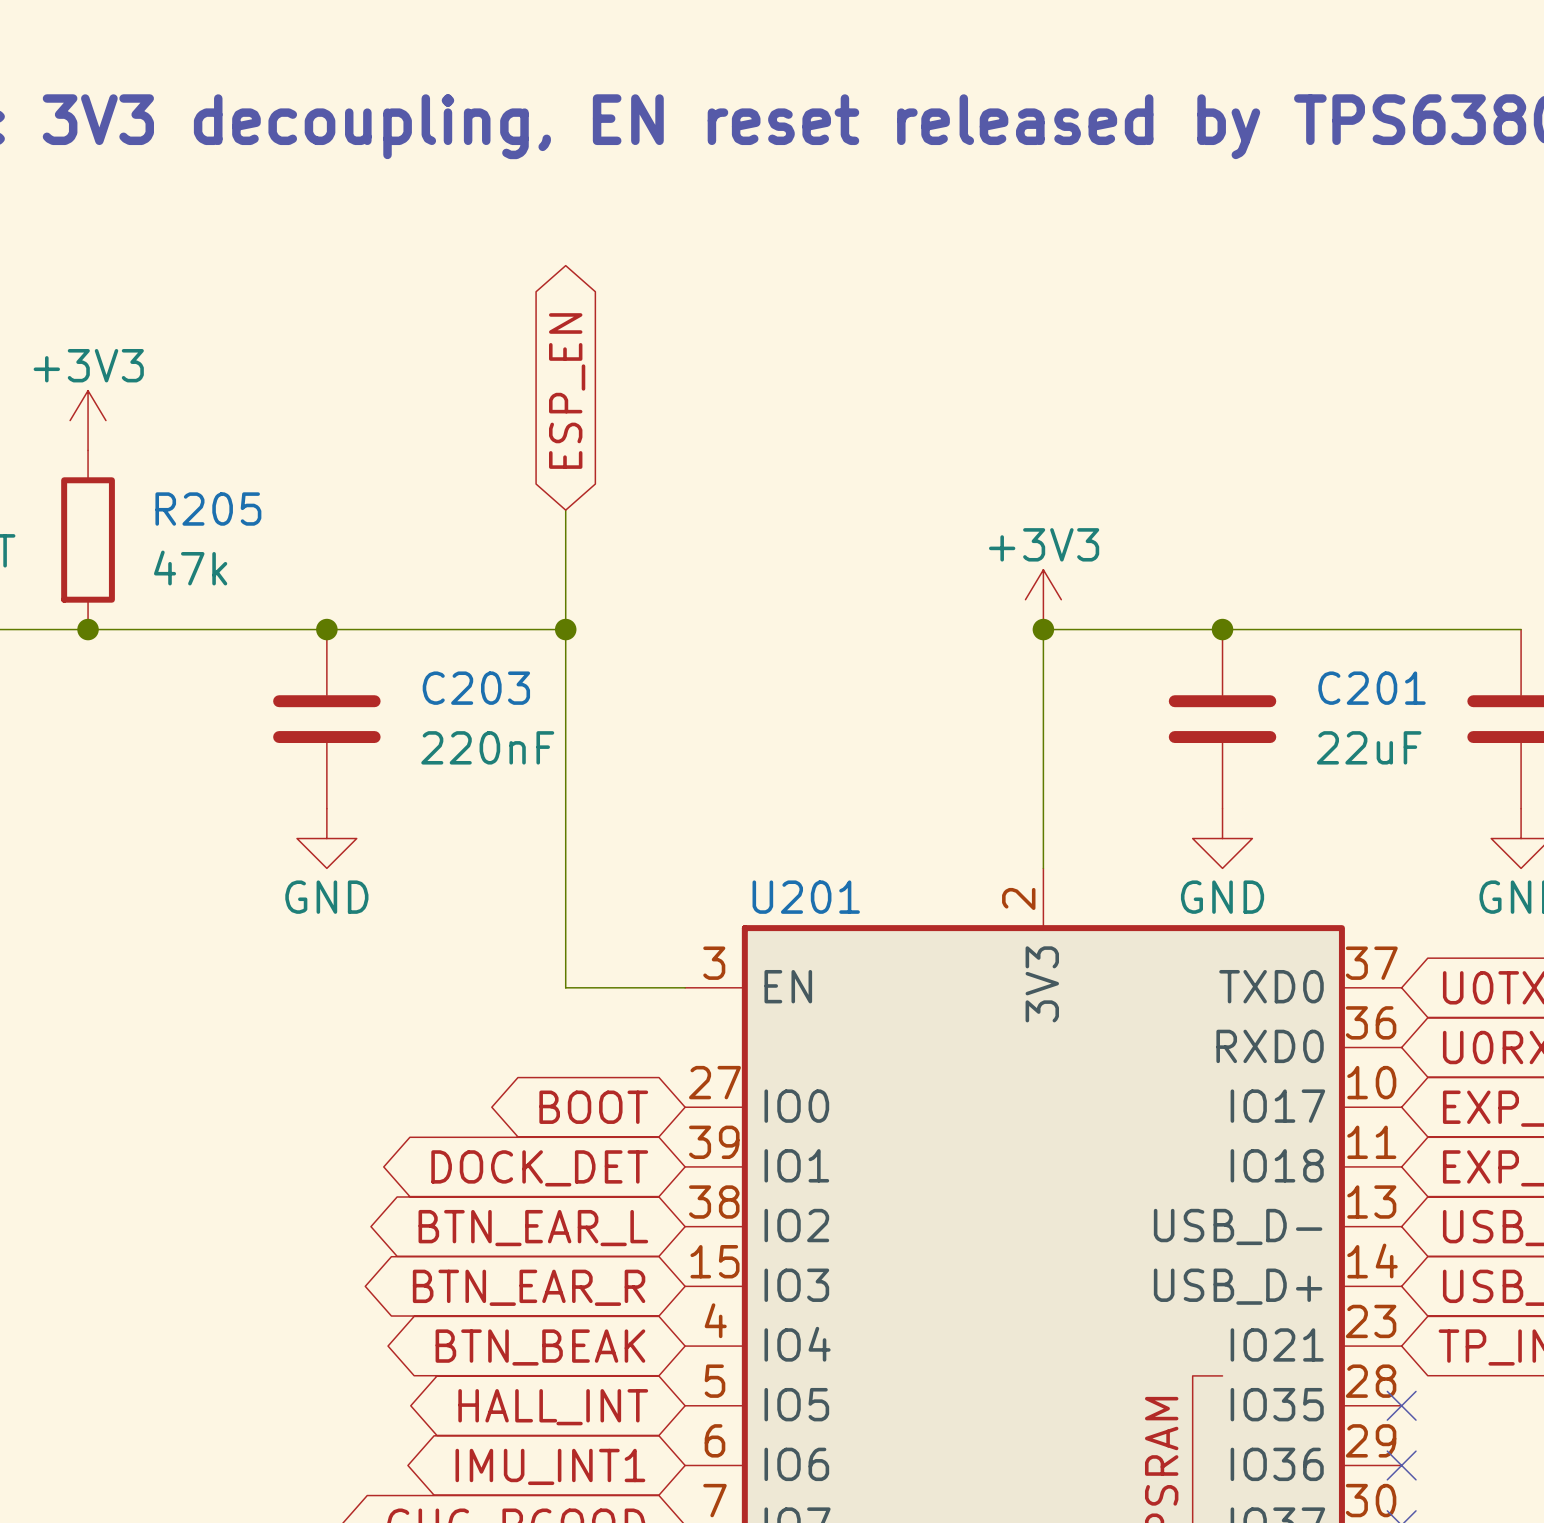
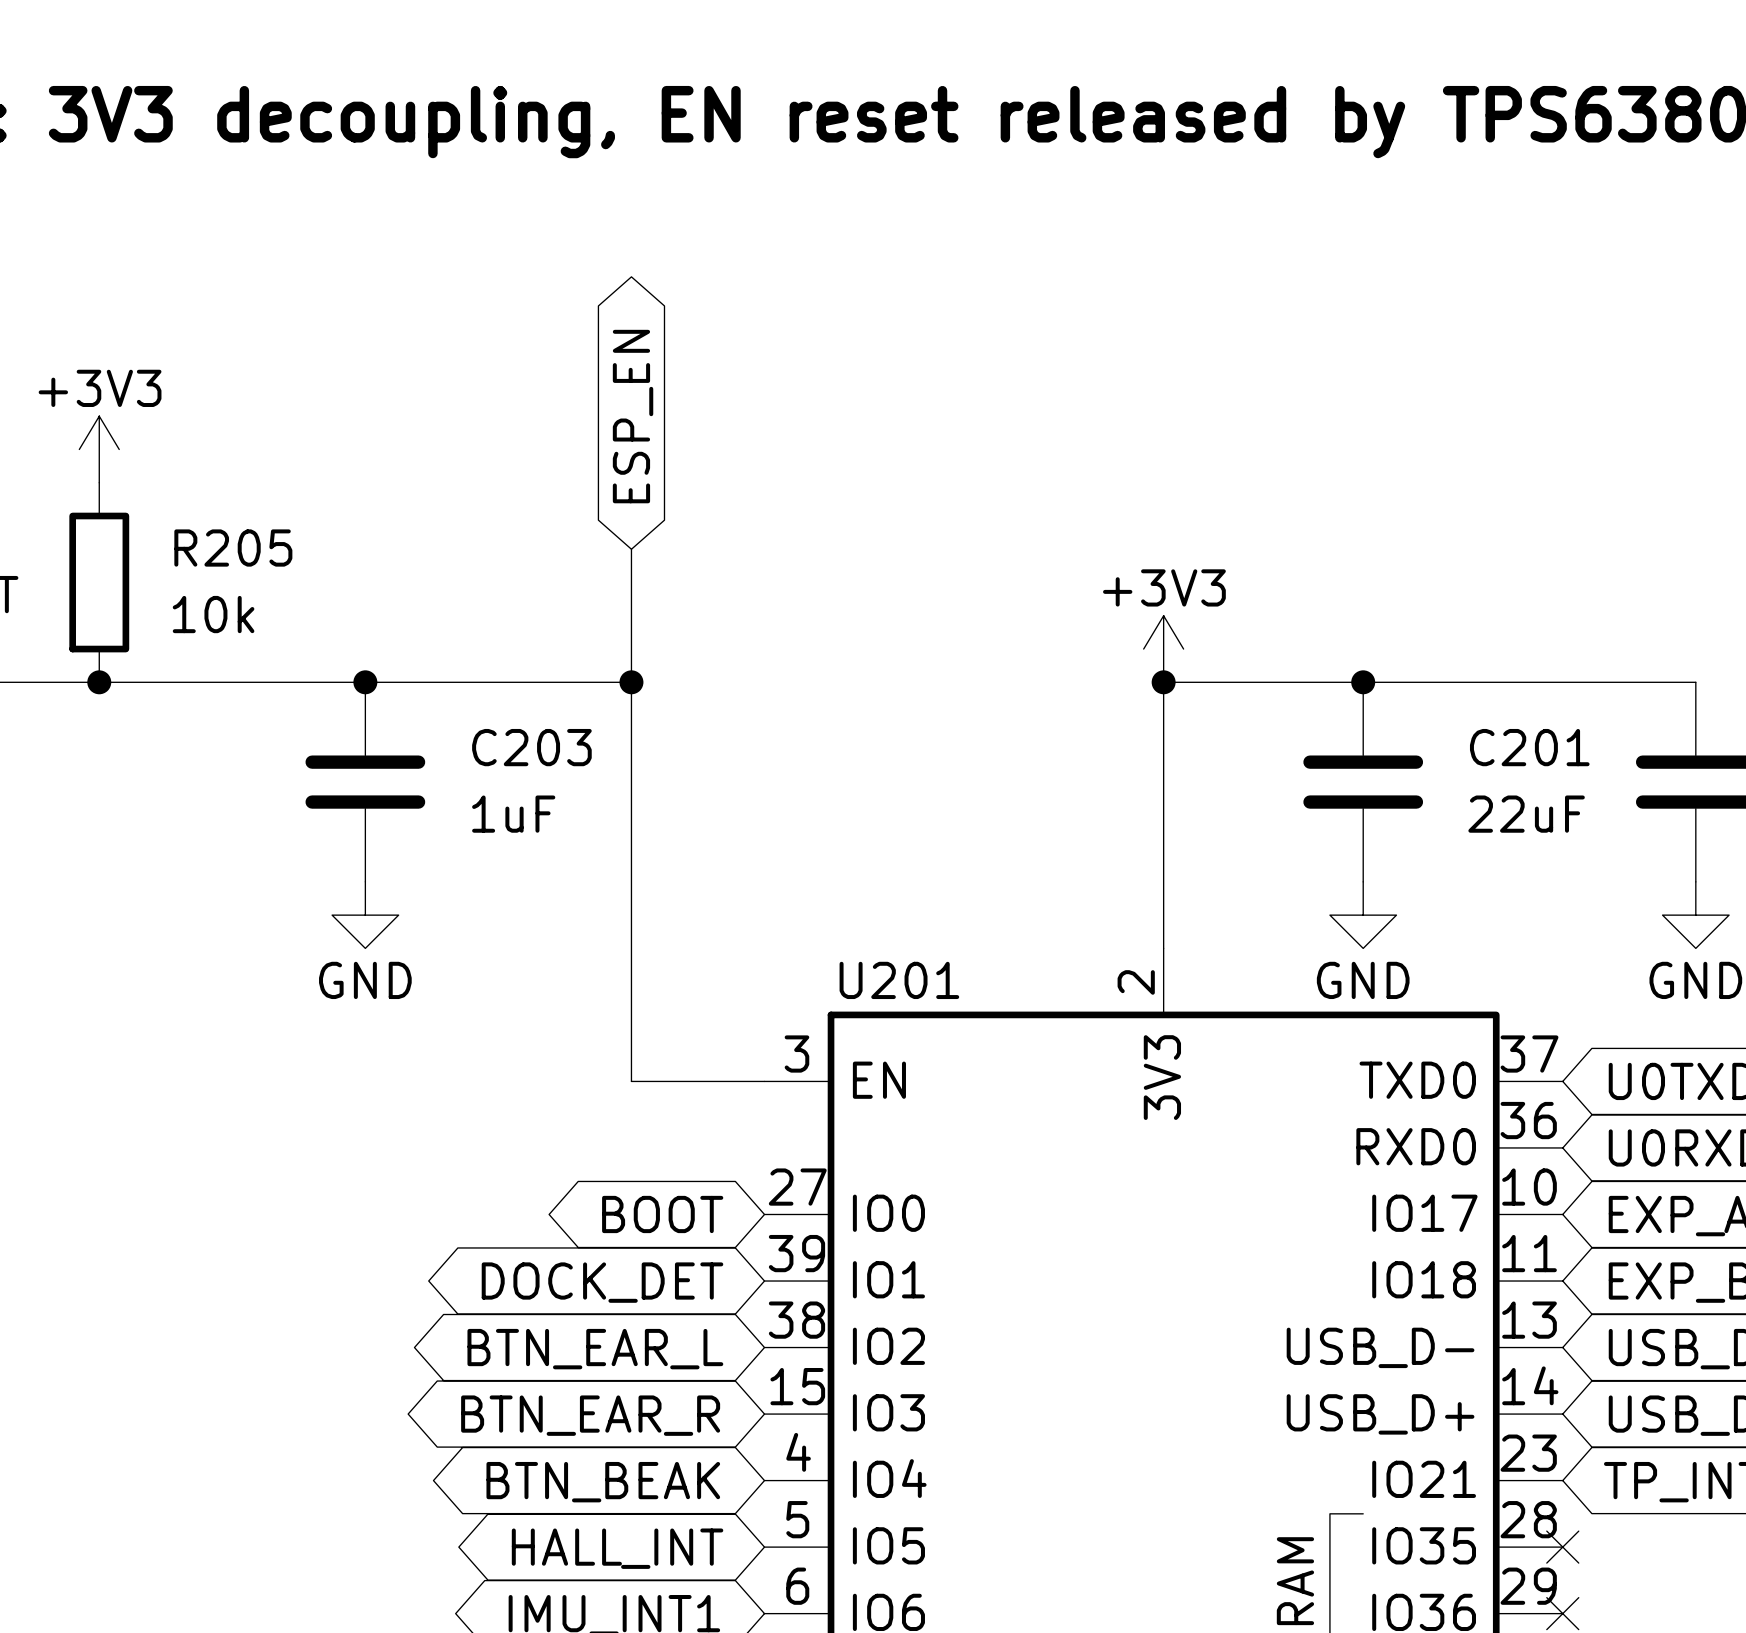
R205 value: 47k (190, 568) -> 10k (213, 614)
C203 value: 220nF (487, 747) -> 1uF (513, 814)

